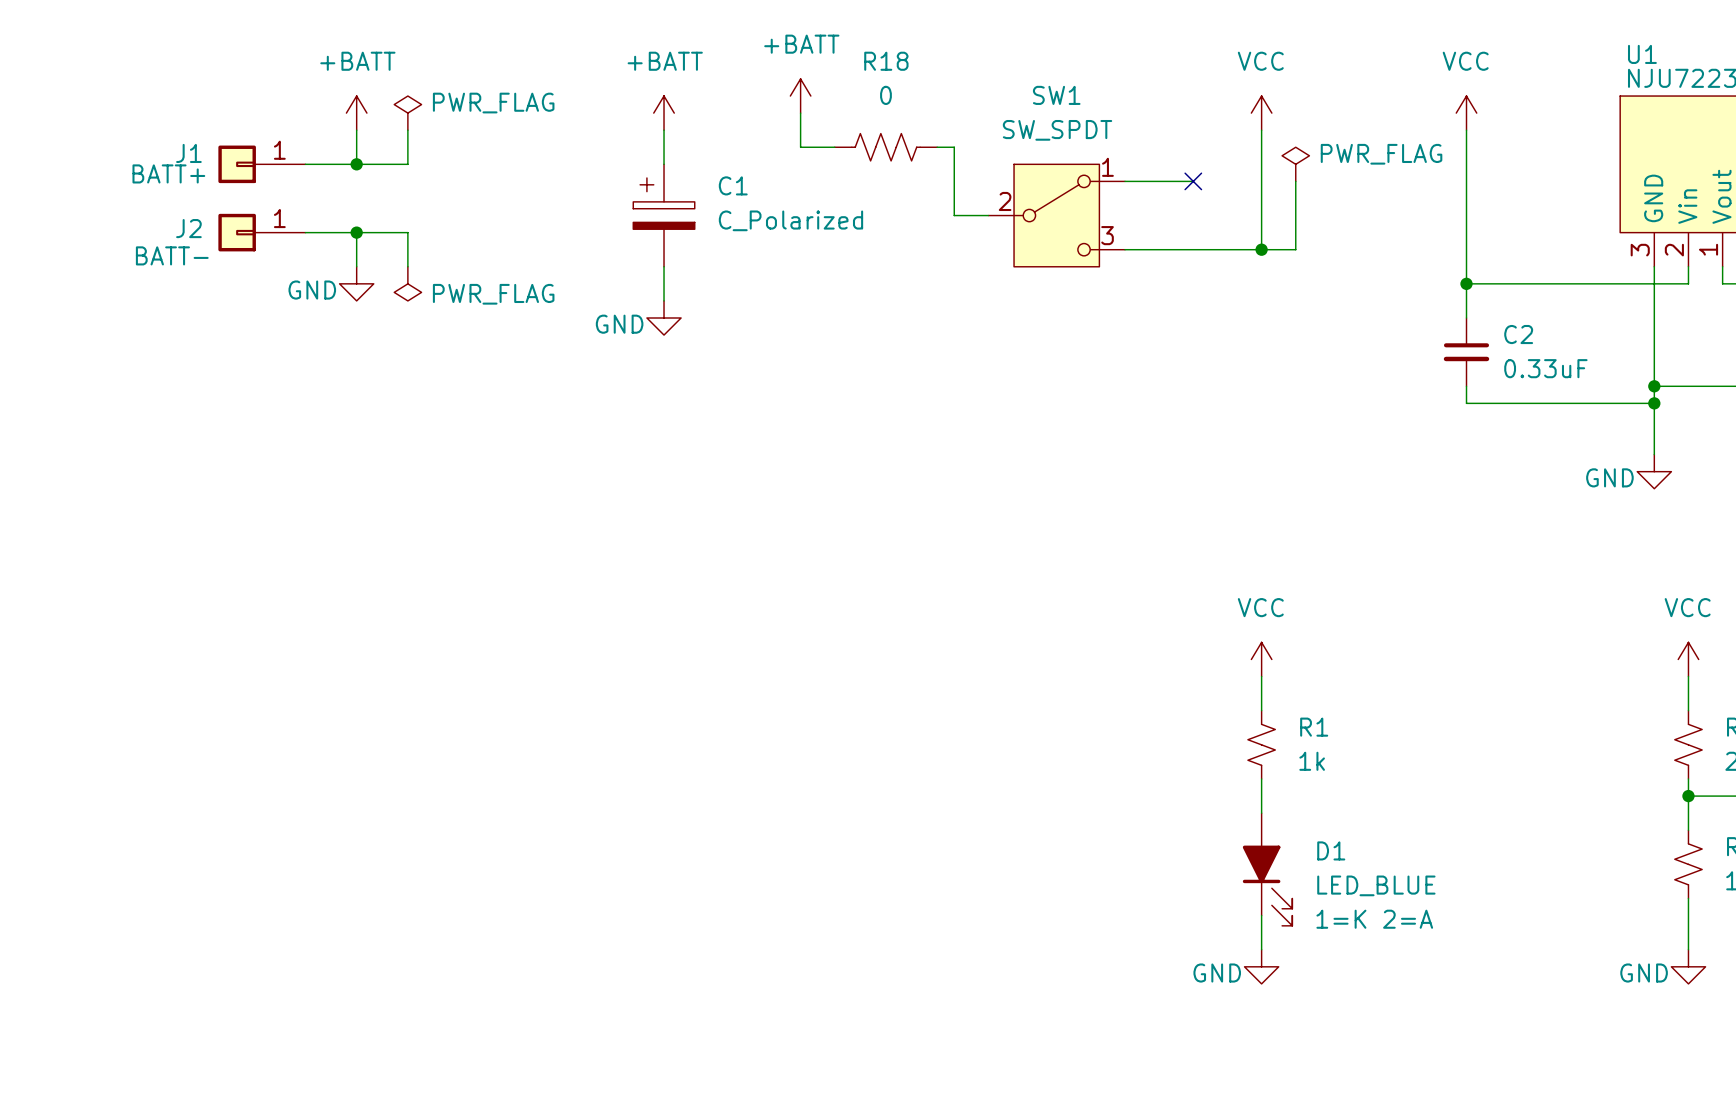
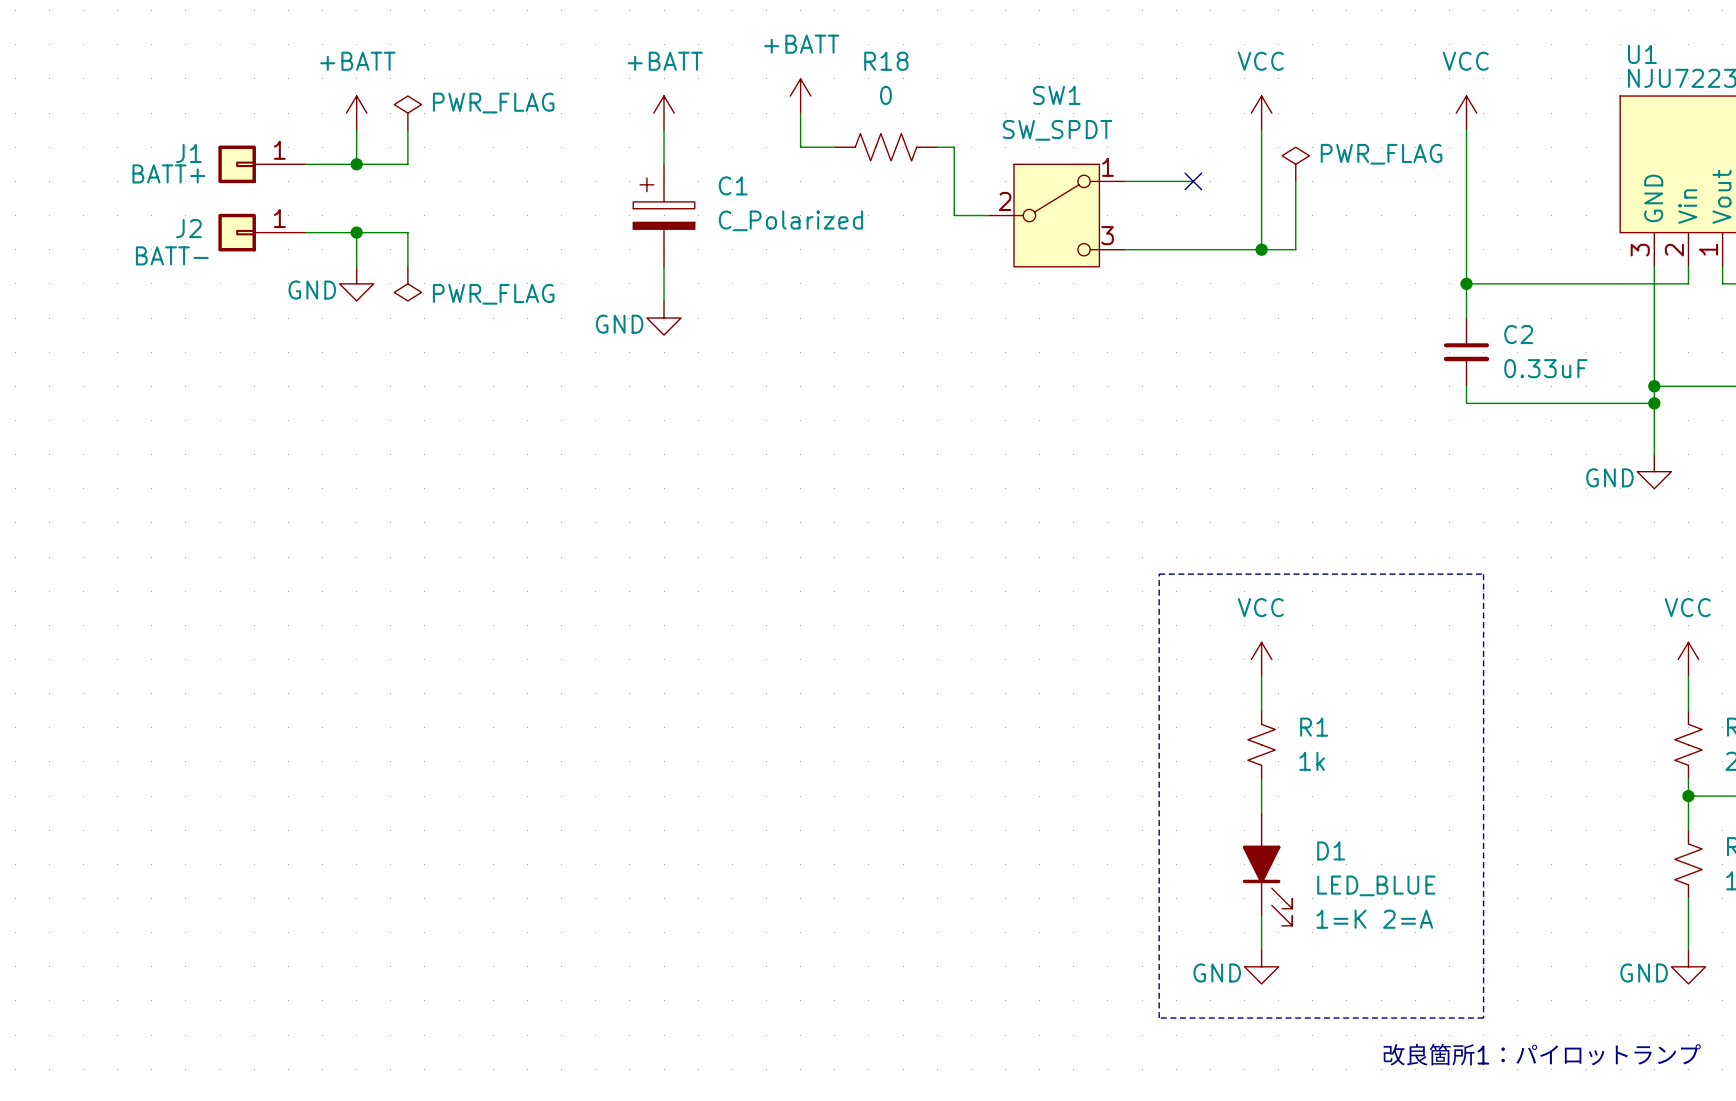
line: none -> (1159, 574) (1483, 574) (1483, 1018) (1159, 1018) (1159, 574)
text: none -> 改良箇所1：パイロットランプ (1542, 1054)

